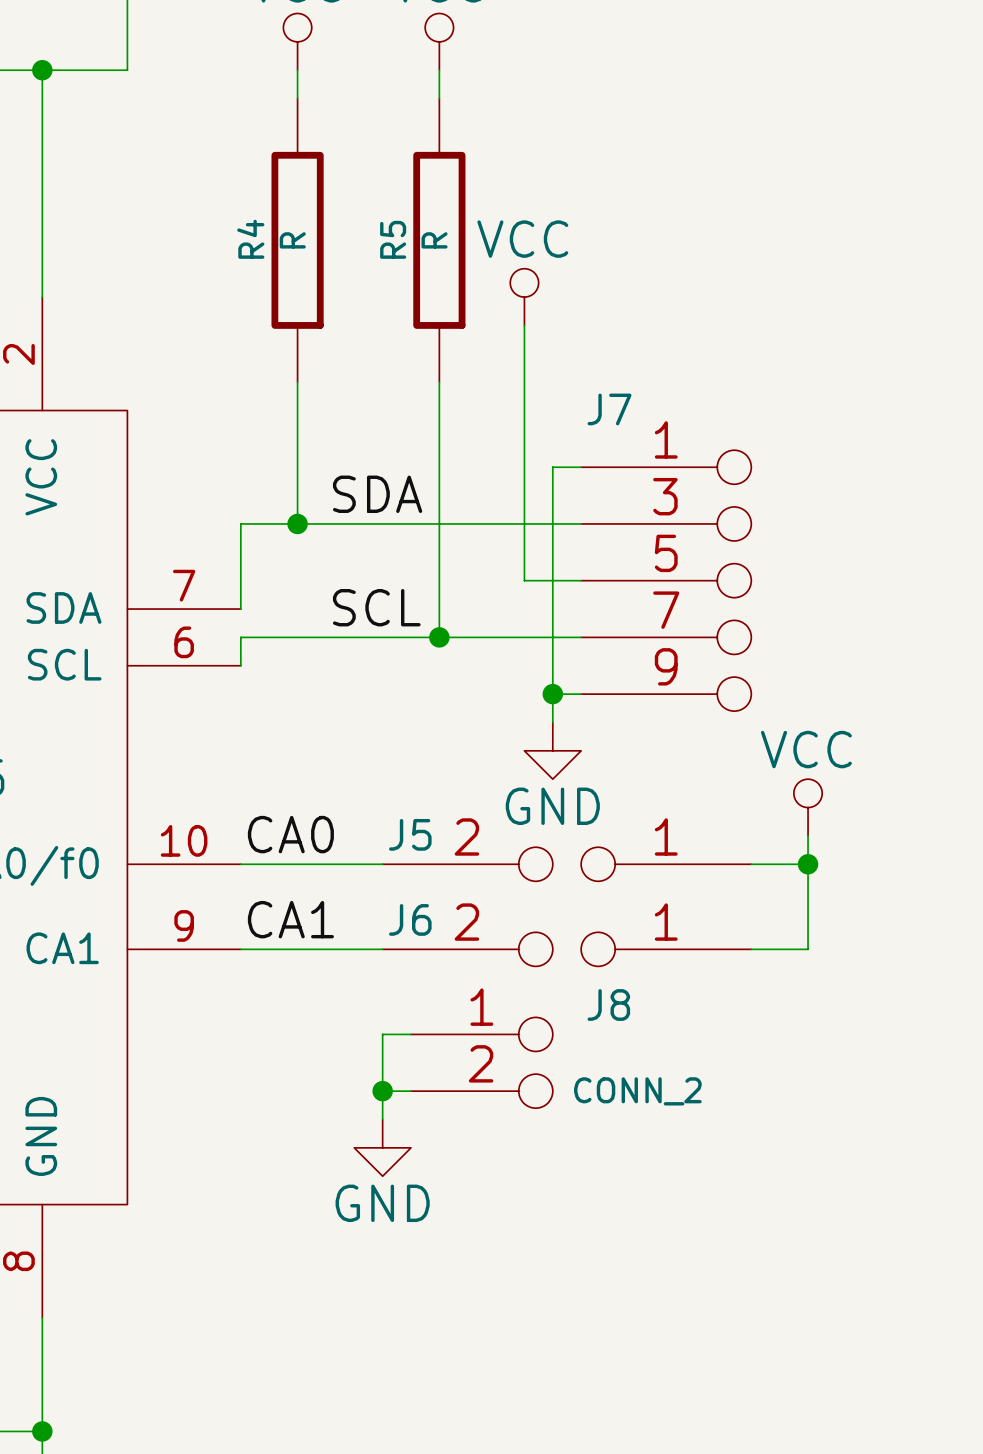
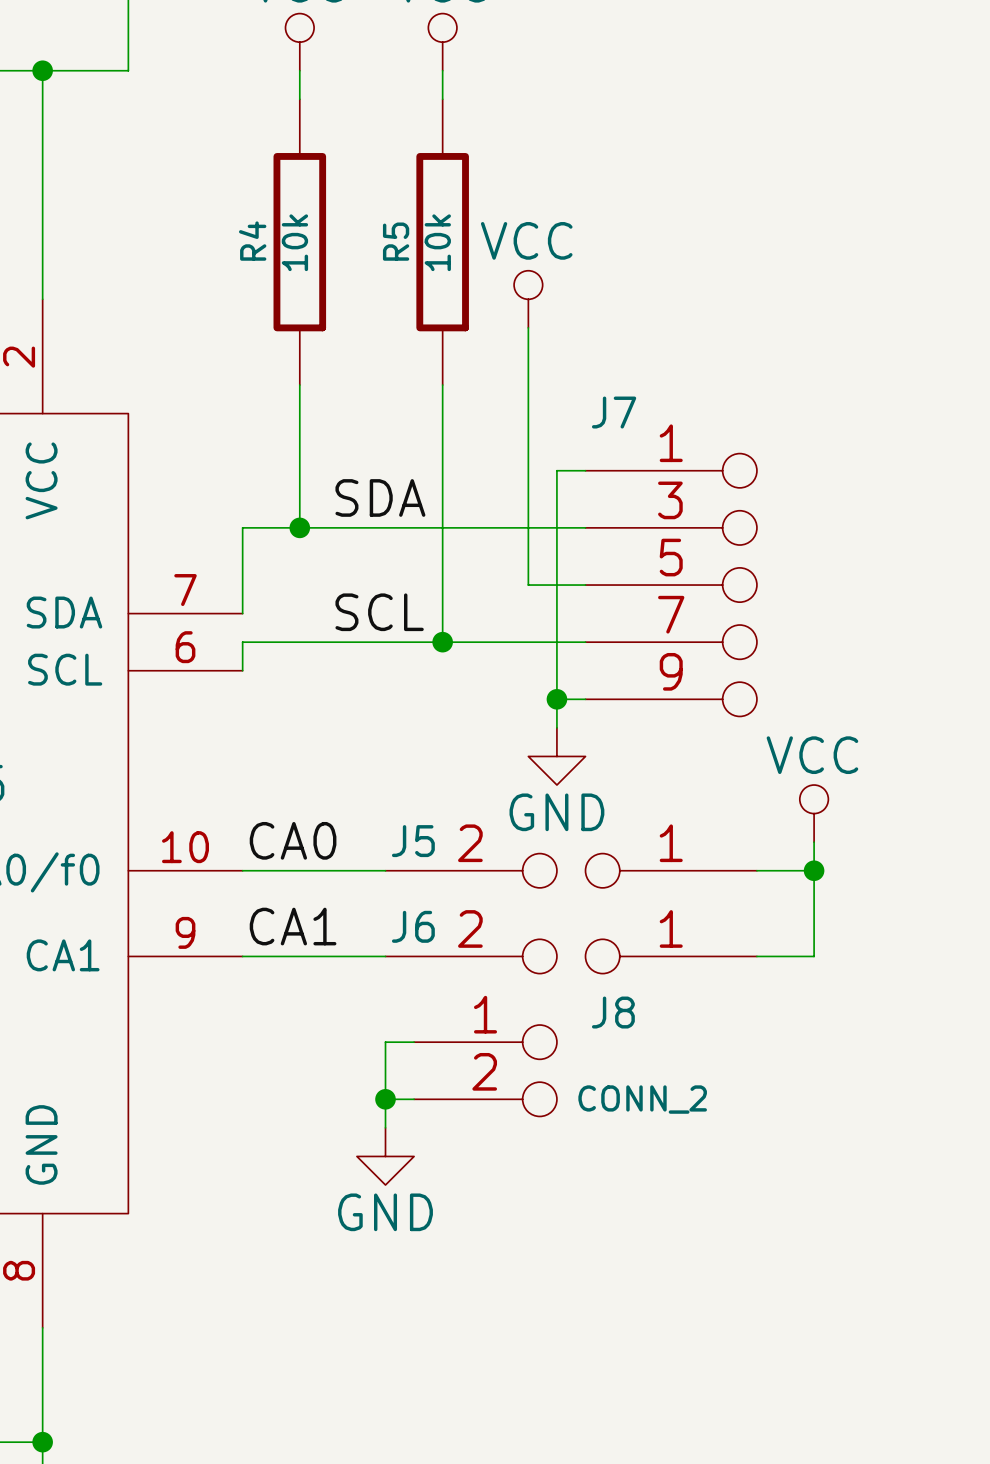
R4 value: R (292, 240) -> 10k (294, 242)
R5 value: R (434, 240) -> 10k (437, 242)

